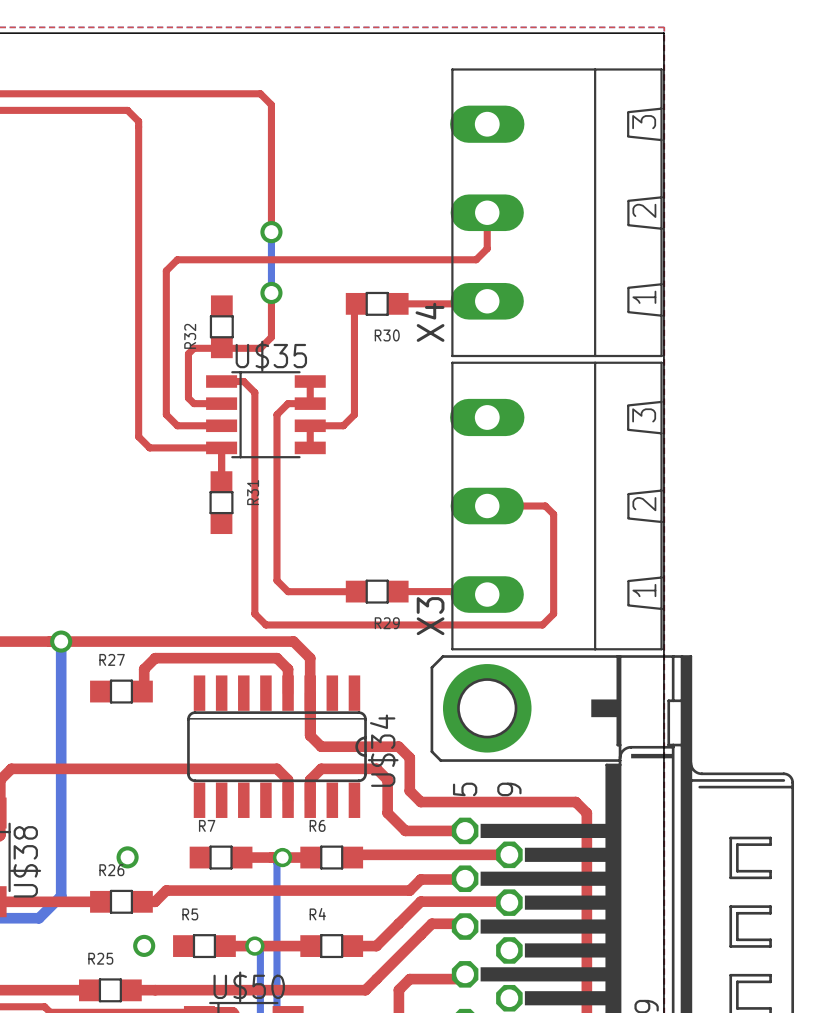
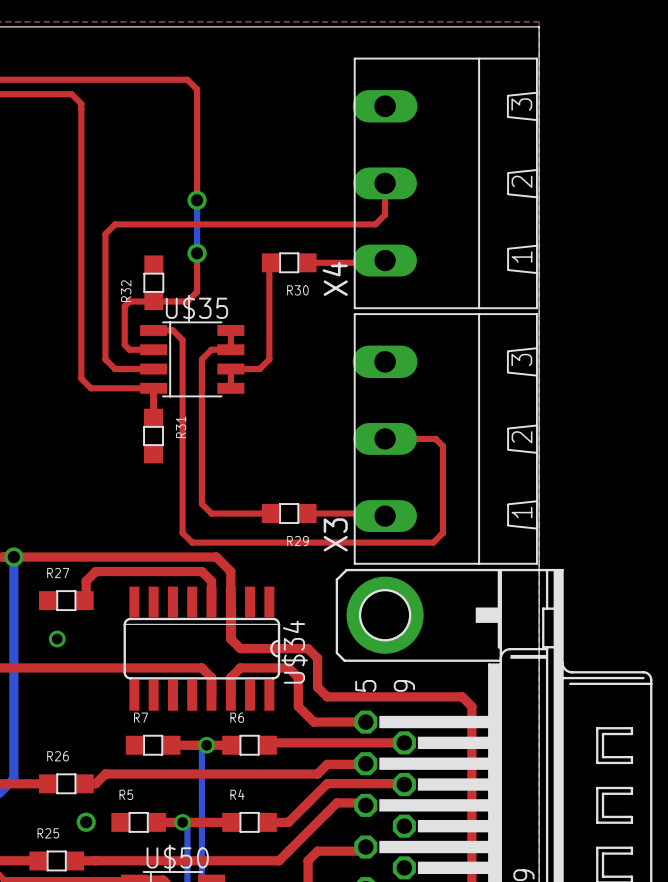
via: none -> (57, 639)
via: (127, 857) -> none

